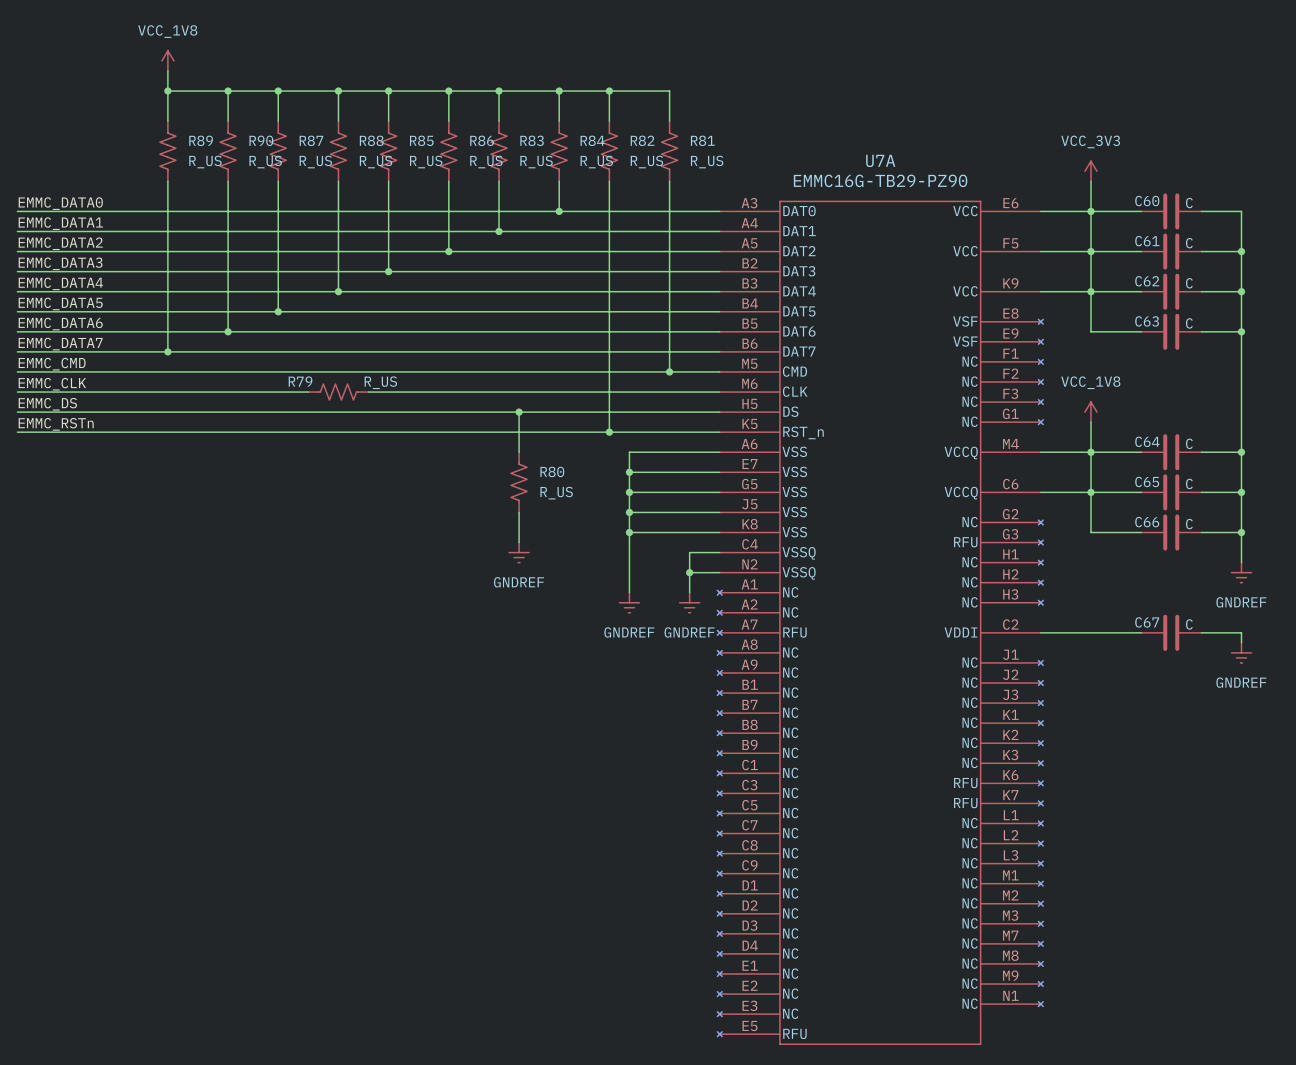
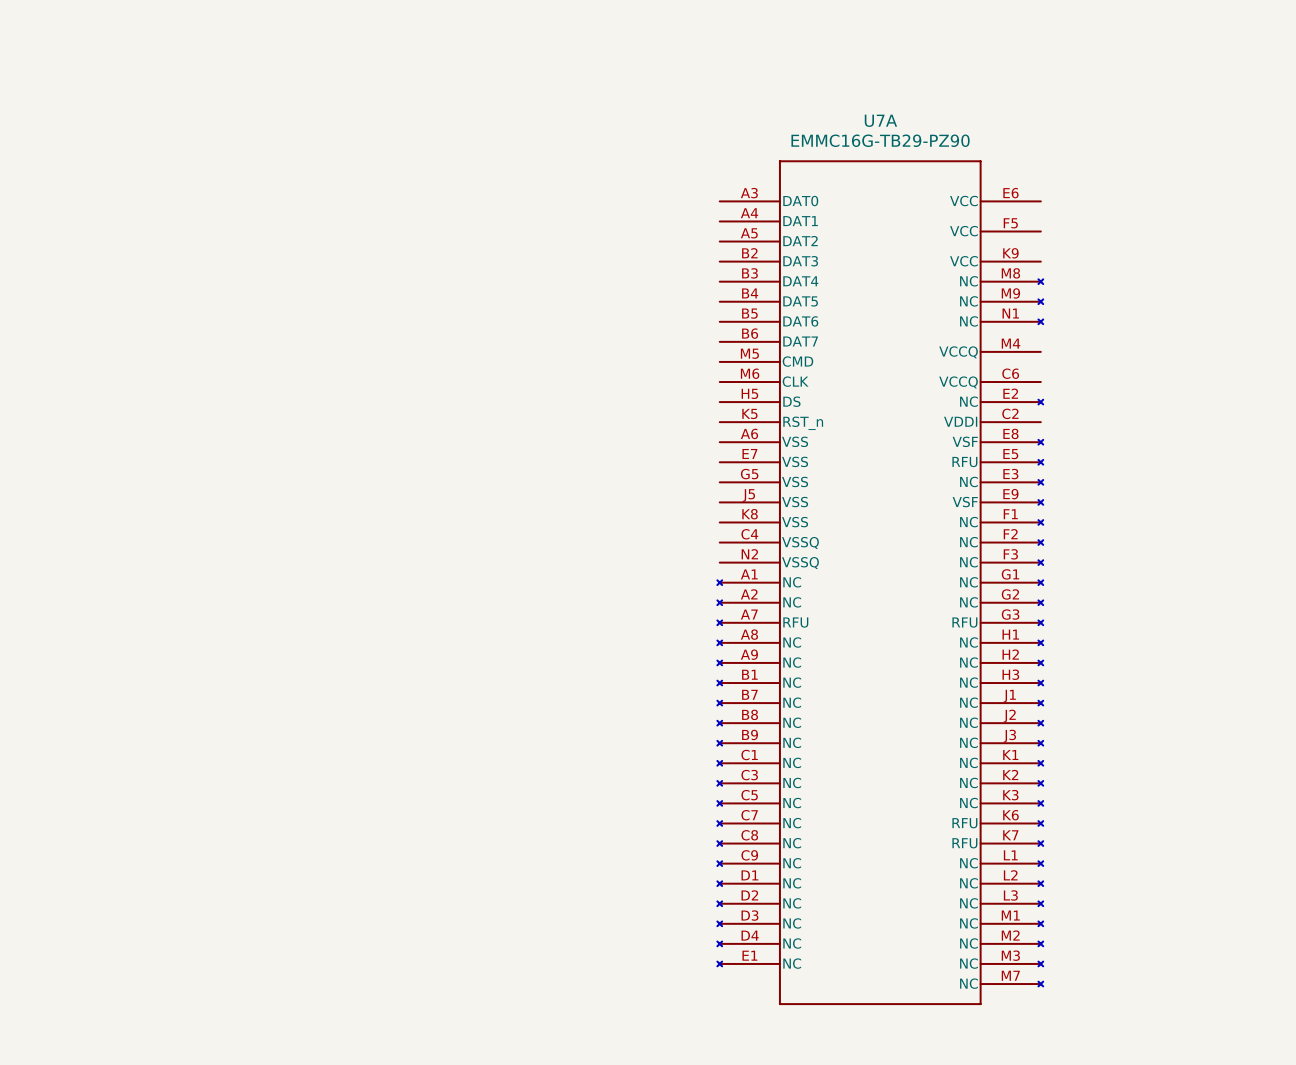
power symbol: VCC_1V8 (167, 60) -> none
wire: (167, 70) (167, 121) -> none
wire: (167, 91) (669, 91) (669, 121) -> none
junction: (167, 91) -> none
wire: (228, 91) (228, 121) -> none
junction: (228, 91) -> none
wire: (278, 91) (278, 121) -> none
junction: (278, 91) -> none
wire: (338, 91) (338, 121) -> none
junction: (338, 91) -> none
wire: (388, 91) (388, 121) -> none
junction: (388, 91) -> none
wire: (448, 91) (448, 121) -> none
junction: (448, 91) -> none
wire: (499, 91) (499, 121) -> none
junction: (499, 91) -> none
wire: (559, 91) (559, 121) -> none
junction: (559, 91) -> none
wire: (609, 91) (609, 121) -> none
junction: (609, 91) -> none
R89: R_US (167, 151) -> none
R90: R_US (228, 151) -> none
R87: R_US (278, 151) -> none
R88: R_US (338, 151) -> none
R85: R_US (388, 151) -> none
R86: R_US (448, 151) -> none
R83: R_US (499, 151) -> none
R84: R_US (559, 151) -> none
R82: R_US (609, 151) -> none
R81: R_US (669, 151) -> none
power symbol: VCC_3V3 (1090, 171) -> none
wire: (167, 181) (167, 351) -> none
wire: (228, 181) (228, 331) -> none
wire: (278, 181) (278, 311) -> none
wire: (338, 181) (338, 291) -> none
wire: (388, 181) (388, 271) -> none
wire: (448, 181) (448, 251) -> none
wire: (499, 181) (499, 231) -> none
wire: (559, 181) (559, 211) -> none
wire: (609, 181) (609, 432) -> none
wire: (669, 181) (669, 371) -> none
wire: (1090, 181) (1090, 331) (1141, 331) -> none
U7A symbol: [717, 200, 1044, 1045] -> [717, 160, 1044, 1005]
label: EMMC_DATA0 (60, 203) -> none
wire: (17, 211) (719, 211) -> none
junction: (559, 211) -> none
wire: (1040, 211) (1141, 211) -> none
junction: (1090, 211) -> none
C60: C (1171, 211) -> none
wire: (1201, 211) (1241, 211) (1241, 562) -> none
label: EMMC_DATA1 (60, 223) -> none
wire: (17, 231) (719, 231) -> none
junction: (499, 231) -> none
label: EMMC_DATA2 (60, 243) -> none
wire: (17, 251) (719, 251) -> none
junction: (448, 251) -> none
wire: (1040, 251) (1141, 251) -> none
junction: (1090, 251) -> none
C61: C (1171, 251) -> none
wire: (1201, 251) (1241, 251) -> none
junction: (1241, 251) -> none
label: EMMC_DATA3 (60, 263) -> none
wire: (17, 271) (719, 271) -> none
junction: (388, 271) -> none
label: EMMC_DATA4 (60, 283) -> none
wire: (17, 291) (719, 291) -> none
junction: (338, 291) -> none
wire: (1040, 291) (1141, 291) -> none
junction: (1090, 291) -> none
C62: C (1171, 291) -> none
wire: (1201, 291) (1241, 291) -> none
junction: (1241, 291) -> none
label: EMMC_DATA5 (60, 303) -> none
wire: (17, 311) (719, 311) -> none
junction: (278, 311) -> none
label: EMMC_DATA6 (60, 324) -> none
wire: (17, 331) (719, 331) -> none
junction: (228, 331) -> none
C63: C (1171, 331) -> none
wire: (1201, 331) (1241, 331) -> none
junction: (1241, 331) -> none
label: EMMC_DATA7 (60, 344) -> none
wire: (17, 351) (719, 351) -> none
junction: (167, 351) -> none
label: EMMC_CMD (52, 364) -> none
wire: (17, 371) (719, 371) -> none
junction: (669, 371) -> none
label: EMMC_CLK (52, 384) -> none
wire: (17, 392) (308, 392) -> none
R79: R_US (338, 392) -> none
wire: (368, 392) (719, 392) -> none
label: EMMC_DS (47, 404) -> none
wire: (17, 412) (719, 412) -> none
wire: (519, 412) (519, 452) -> none
junction: (519, 412) -> none
power symbol: VCC_1V8 (1090, 412) -> none
wire: (1090, 422) (1090, 532) (1141, 532) -> none
label: EMMC_RSTn (56, 424) -> none
wire: (17, 432) (719, 432) -> none
junction: (609, 432) -> none
wire: (719, 452) (629, 452) (629, 592) -> none
wire: (1040, 452) (1141, 452) -> none
junction: (1090, 452) -> none
C64: C (1171, 452) -> none
wire: (1201, 452) (1241, 452) -> none
junction: (1241, 452) -> none
wire: (629, 472) (719, 472) -> none
junction: (629, 472) -> none
R80: R_US (519, 482) -> none
wire: (629, 492) (719, 492) -> none
junction: (629, 492) -> none
wire: (1040, 492) (1141, 492) -> none
junction: (1090, 492) -> none
C65: C (1171, 492) -> none
wire: (1201, 492) (1241, 492) -> none
junction: (1241, 492) -> none
wire: (519, 512) (519, 542) -> none
wire: (629, 512) (719, 512) -> none
junction: (629, 512) -> none
wire: (629, 532) (719, 532) -> none
junction: (629, 532) -> none
C66: C (1171, 532) -> none
wire: (1201, 532) (1241, 532) -> none
junction: (1241, 532) -> none
power symbol: GNDREF (519, 552) -> none
wire: (719, 552) (689, 552) (689, 592) -> none
wire: (689, 572) (719, 572) -> none
junction: (689, 572) -> none
power symbol: GNDREF (1241, 572) -> none
power symbol: GNDREF (629, 602) -> none
power symbol: GNDREF (689, 602) -> none
wire: (1040, 632) (1141, 632) -> none
C67: C (1171, 632) -> none
wire: (1201, 632) (1241, 632) (1241, 642) -> none
power symbol: GNDREF (1241, 652) -> none

